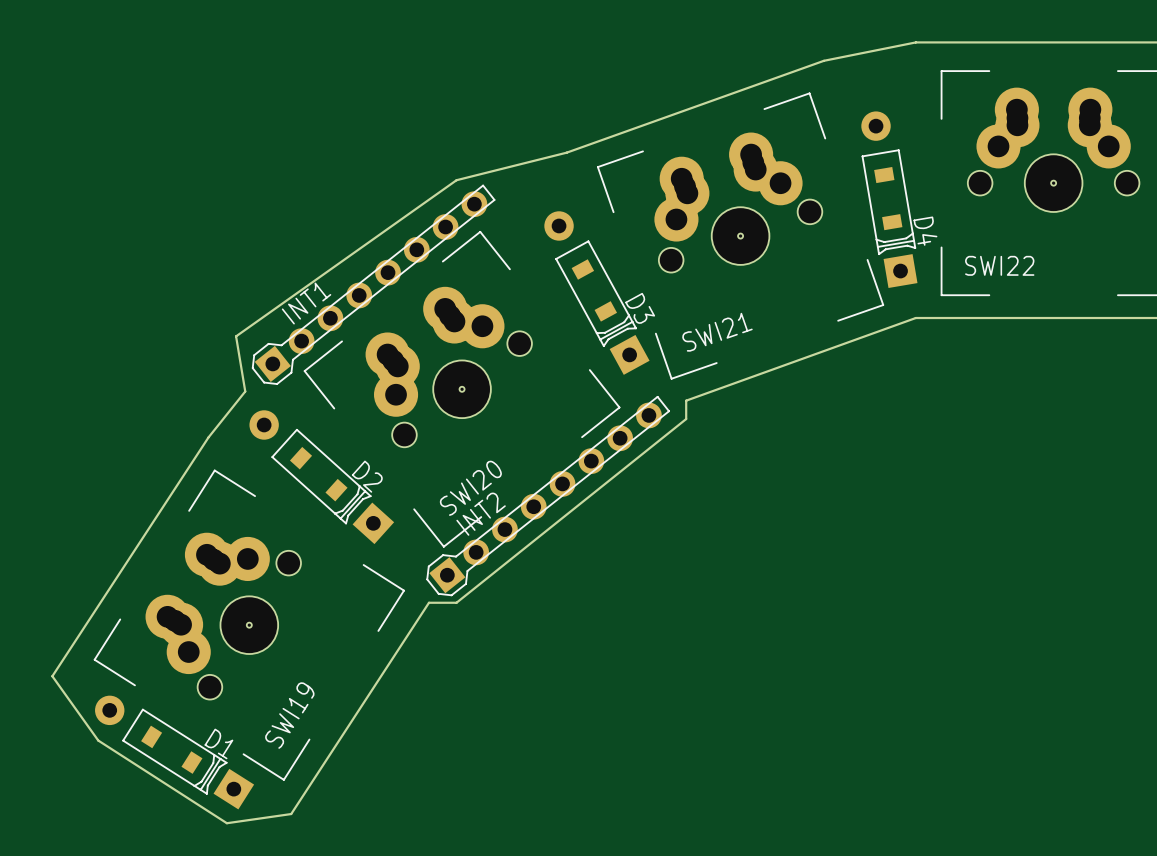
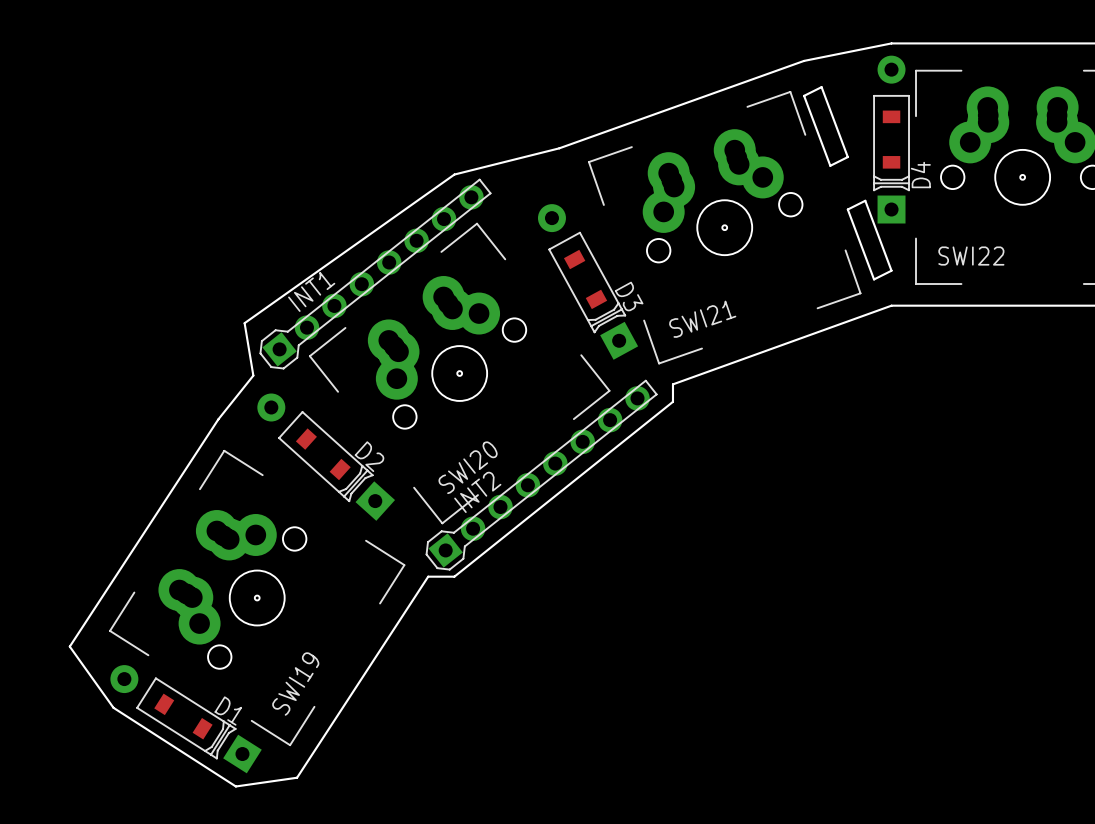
board edge: none -> (821, 87) (804, 95) (830, 165) (847, 157) (821, 87)
D4 rotation: 0° (889, 199) -> 9.6° clockwise (891, 139)
board edge: none -> (865, 200) (891, 270) (874, 279) (847, 209) (865, 200)

